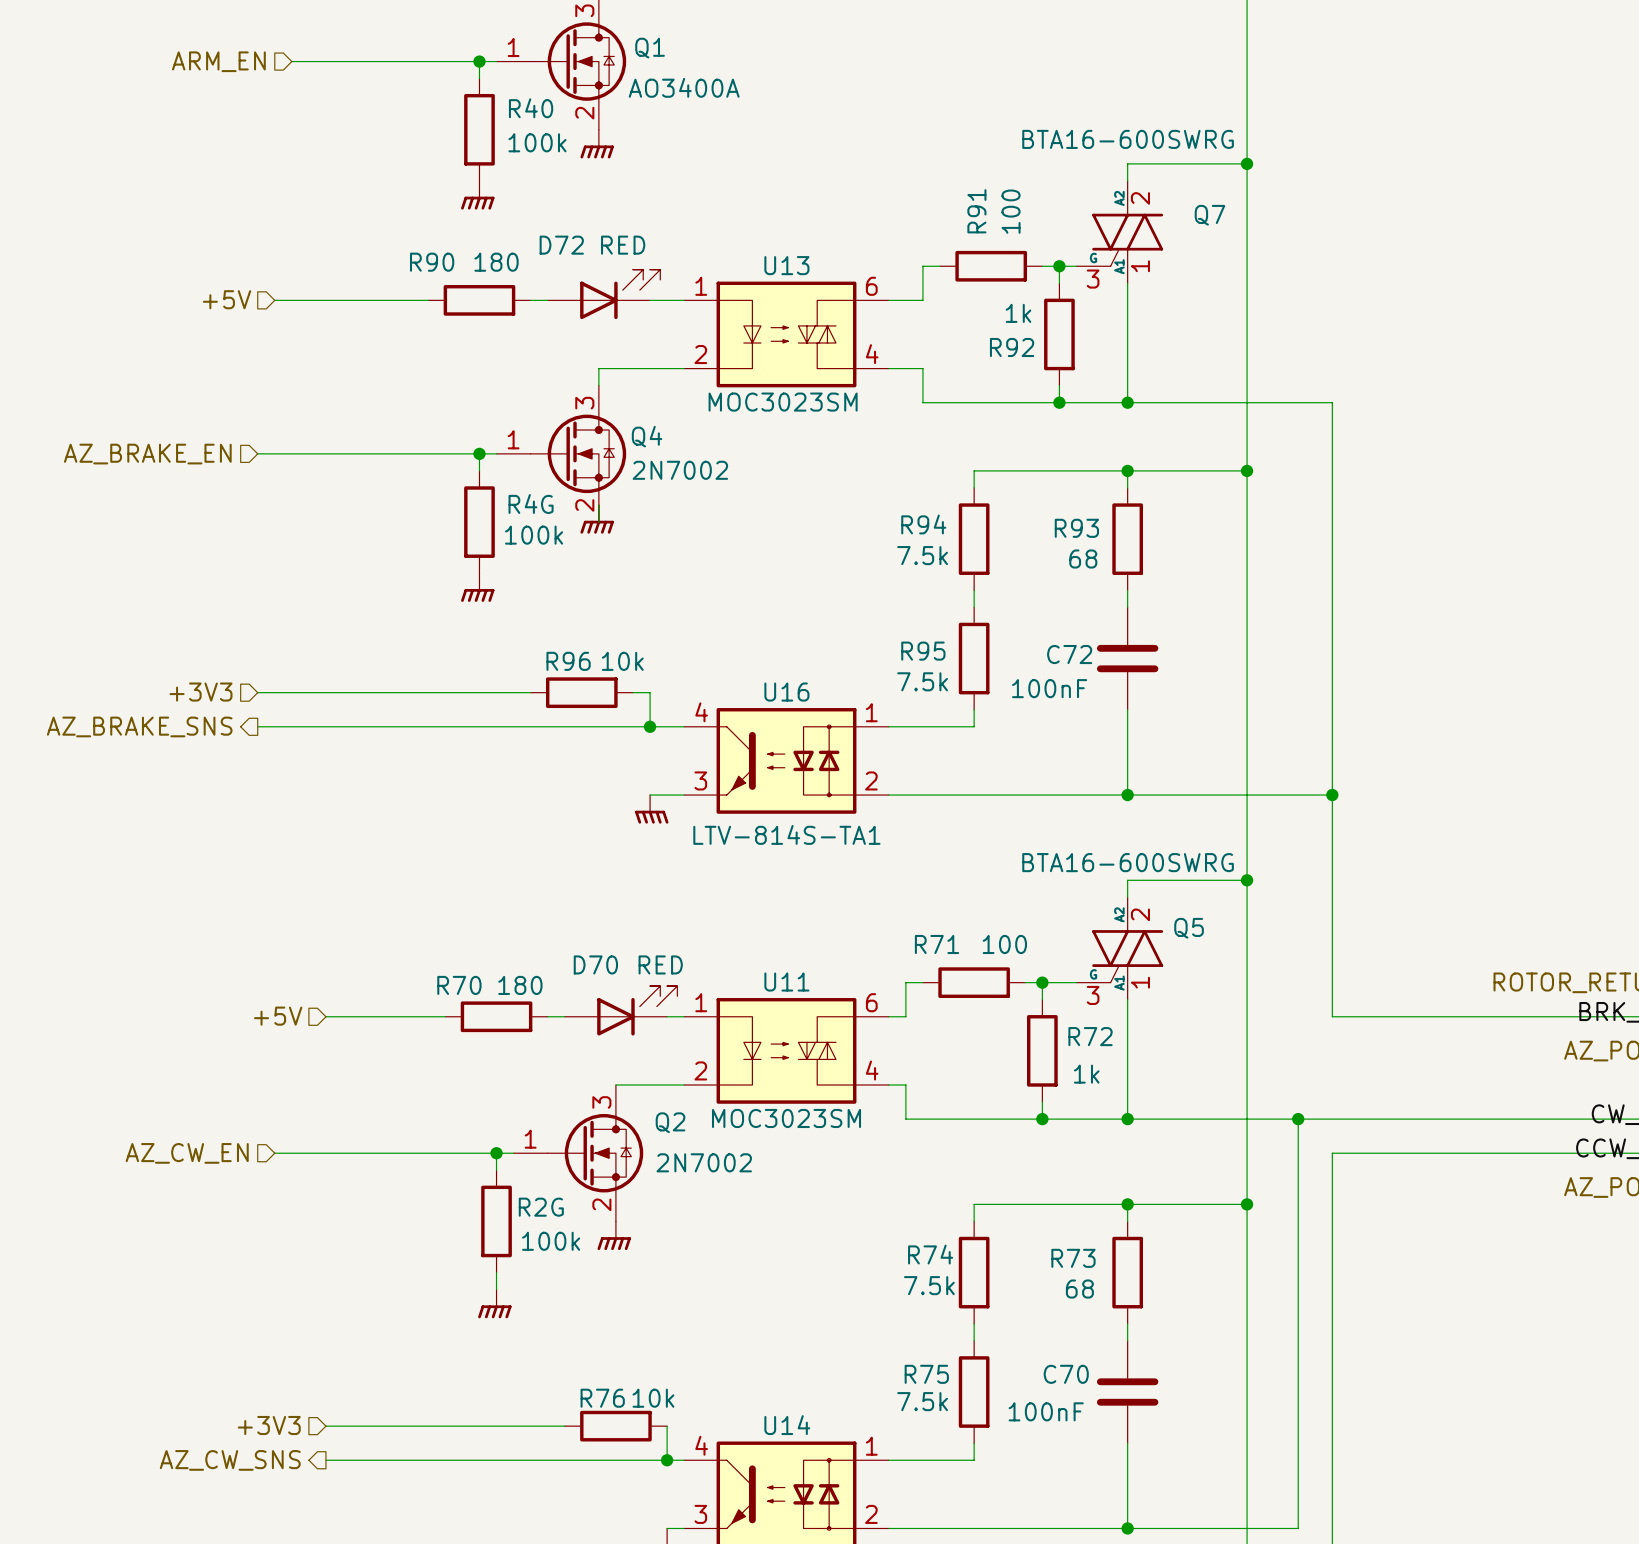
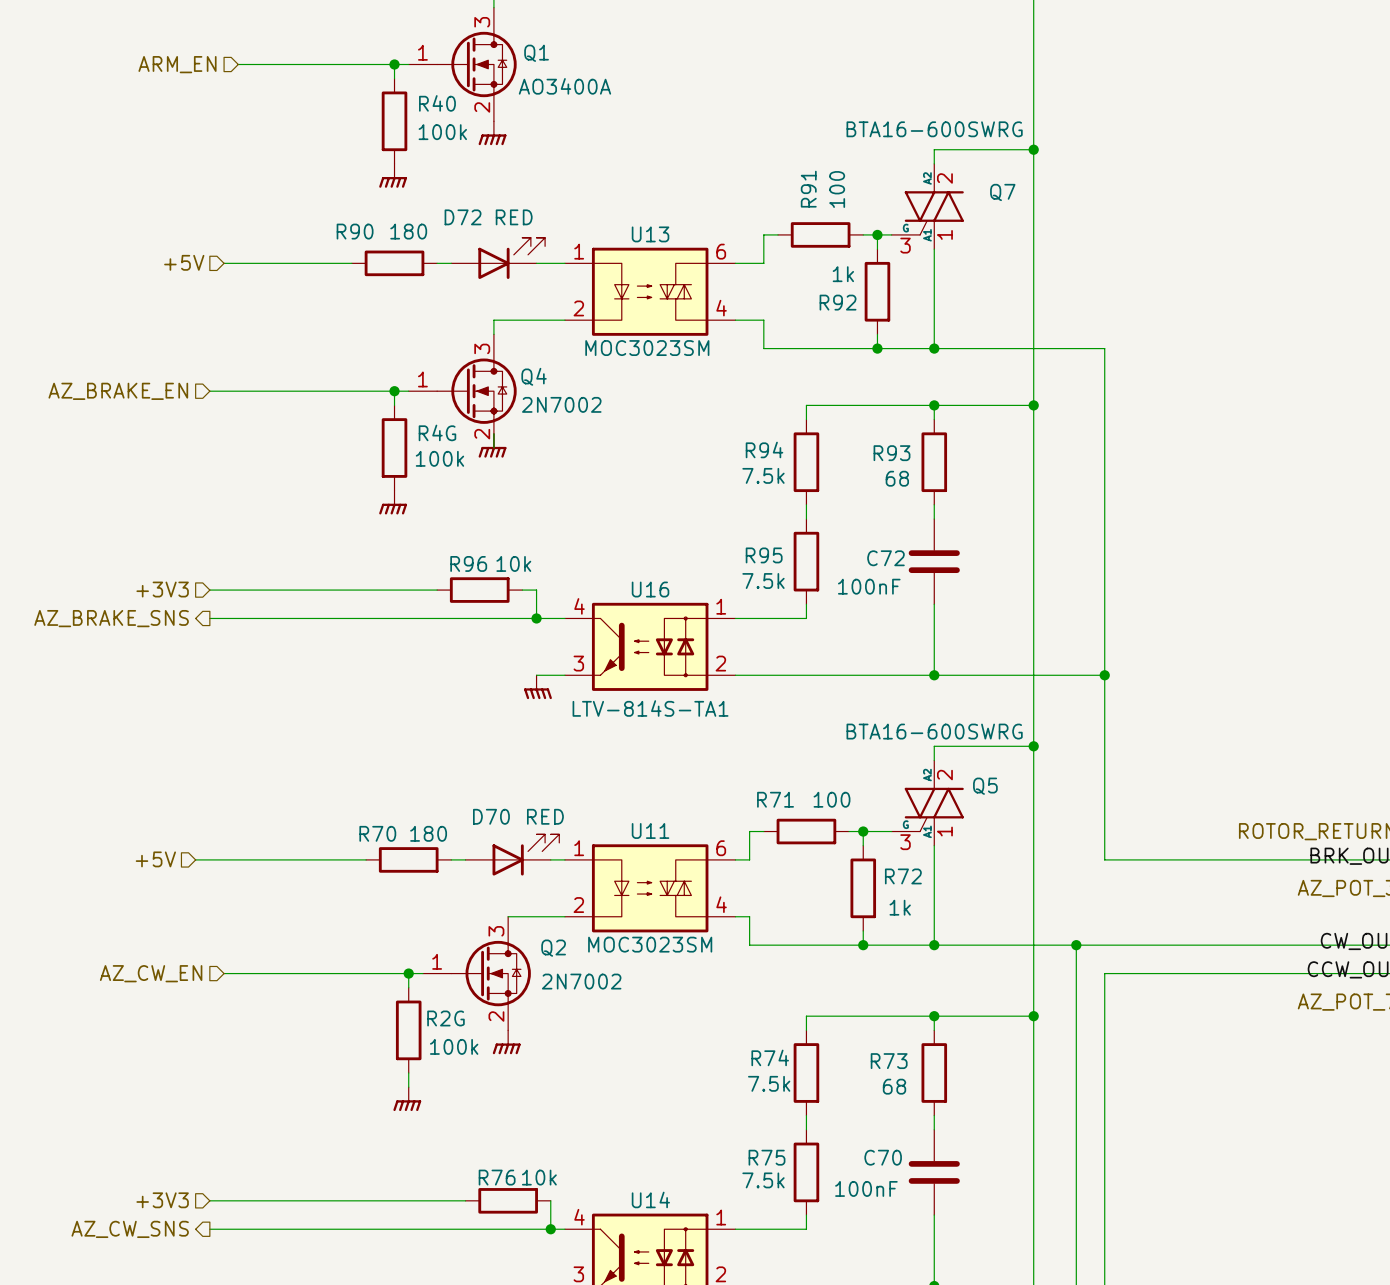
wire: none -> (195, 859) (266, 859)
hierarchical label position: +5V (278, 1016) -> +5V (155, 859)
hierarchical label position: +3V3 (269, 1425) -> +3V3 (162, 1200)
wire: none -> (209, 1200) (266, 1200)
hierarchical label position: AZ_CW_SNS (230, 1460) -> AZ_CW_SNS (130, 1229)
wire: none -> (209, 1229) (266, 1229)

